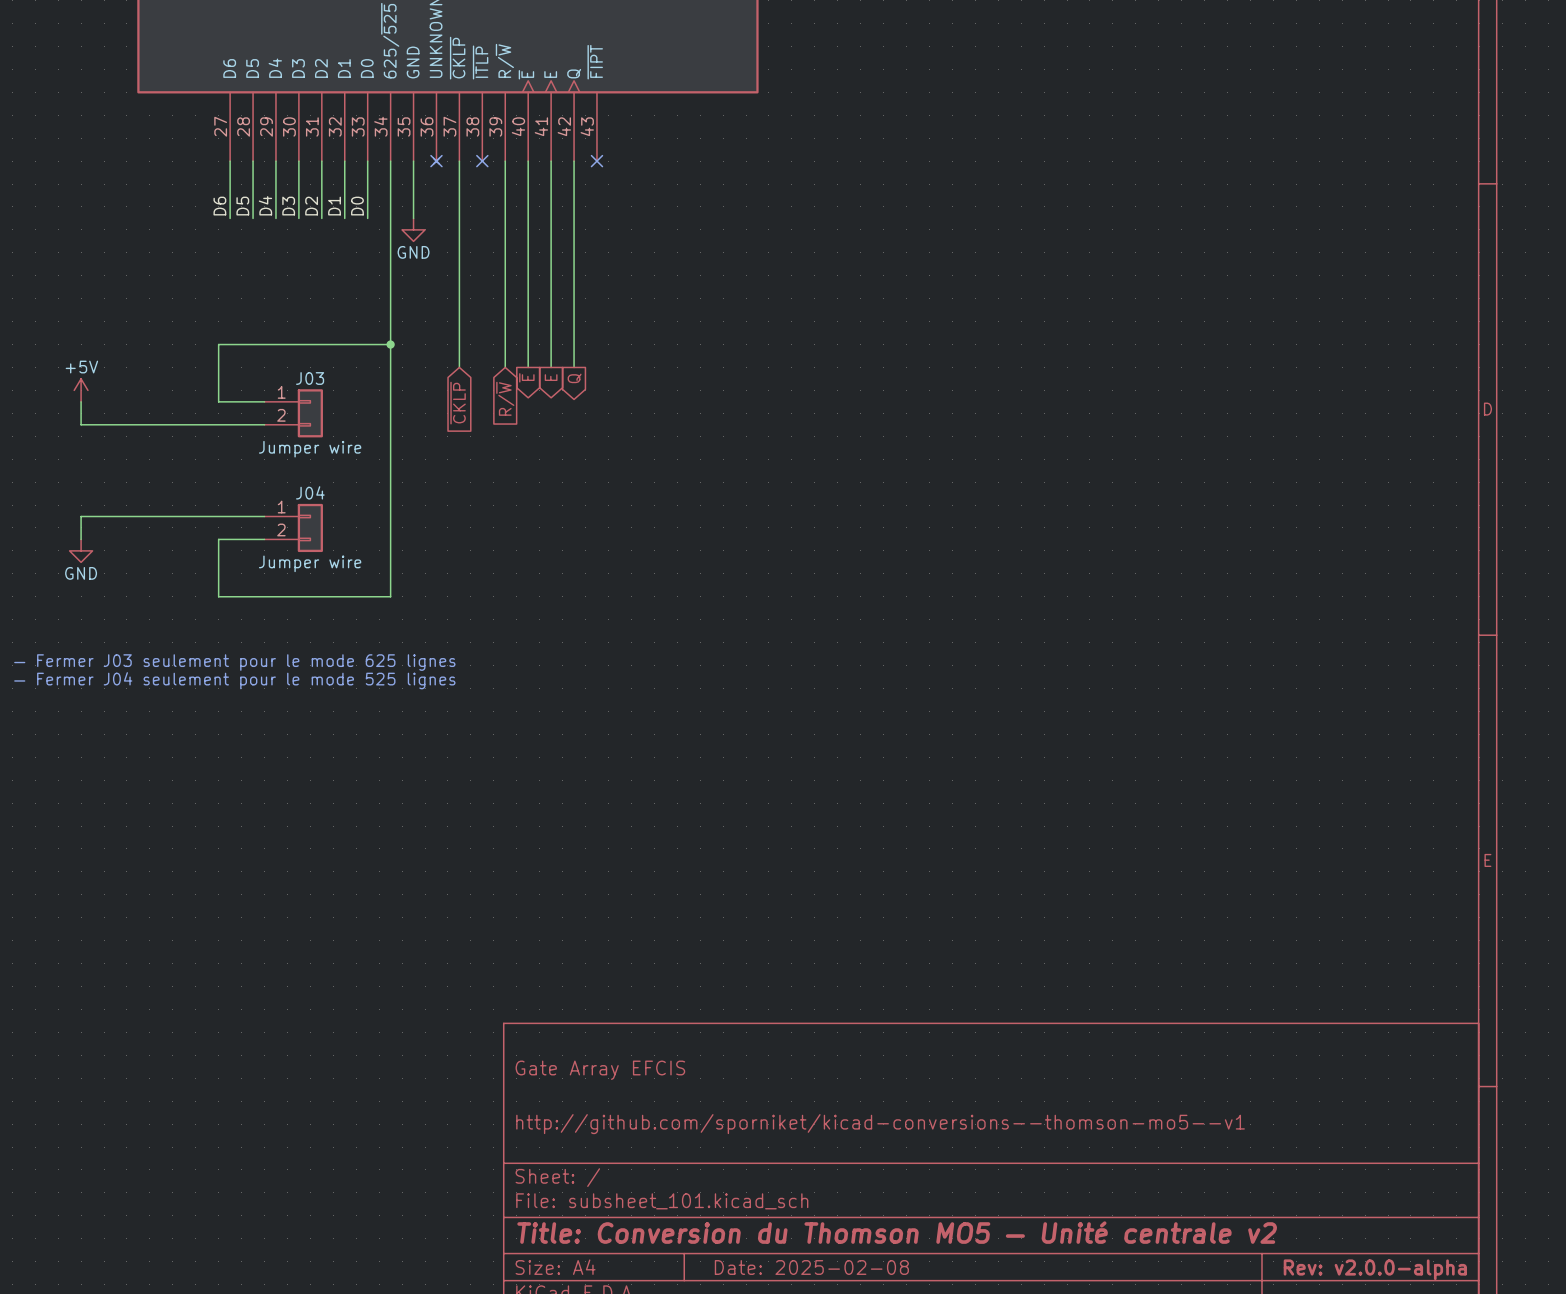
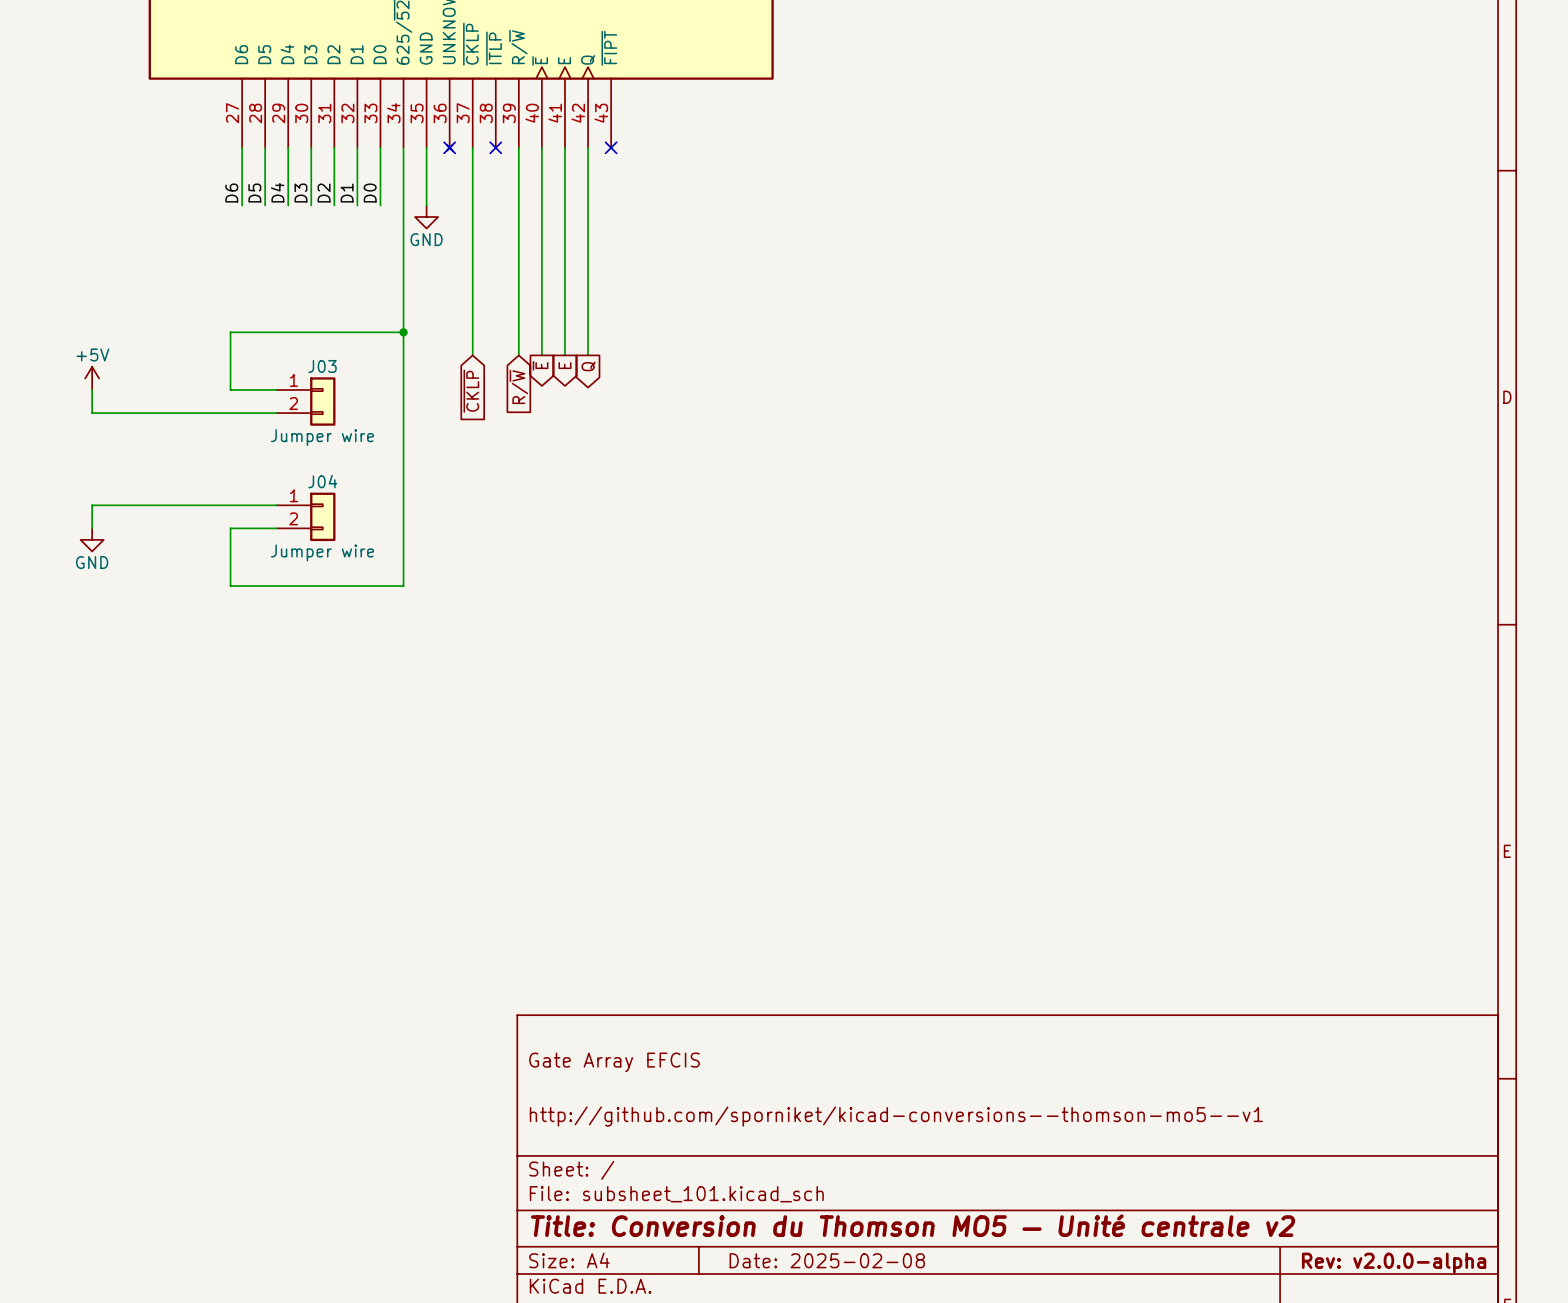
text: — Fermer J03 seulement pour le mode 625 lignes (234, 662) -> none
text: — Fermer J04 seulement pour le mode 525 lignes (234, 680) -> none

